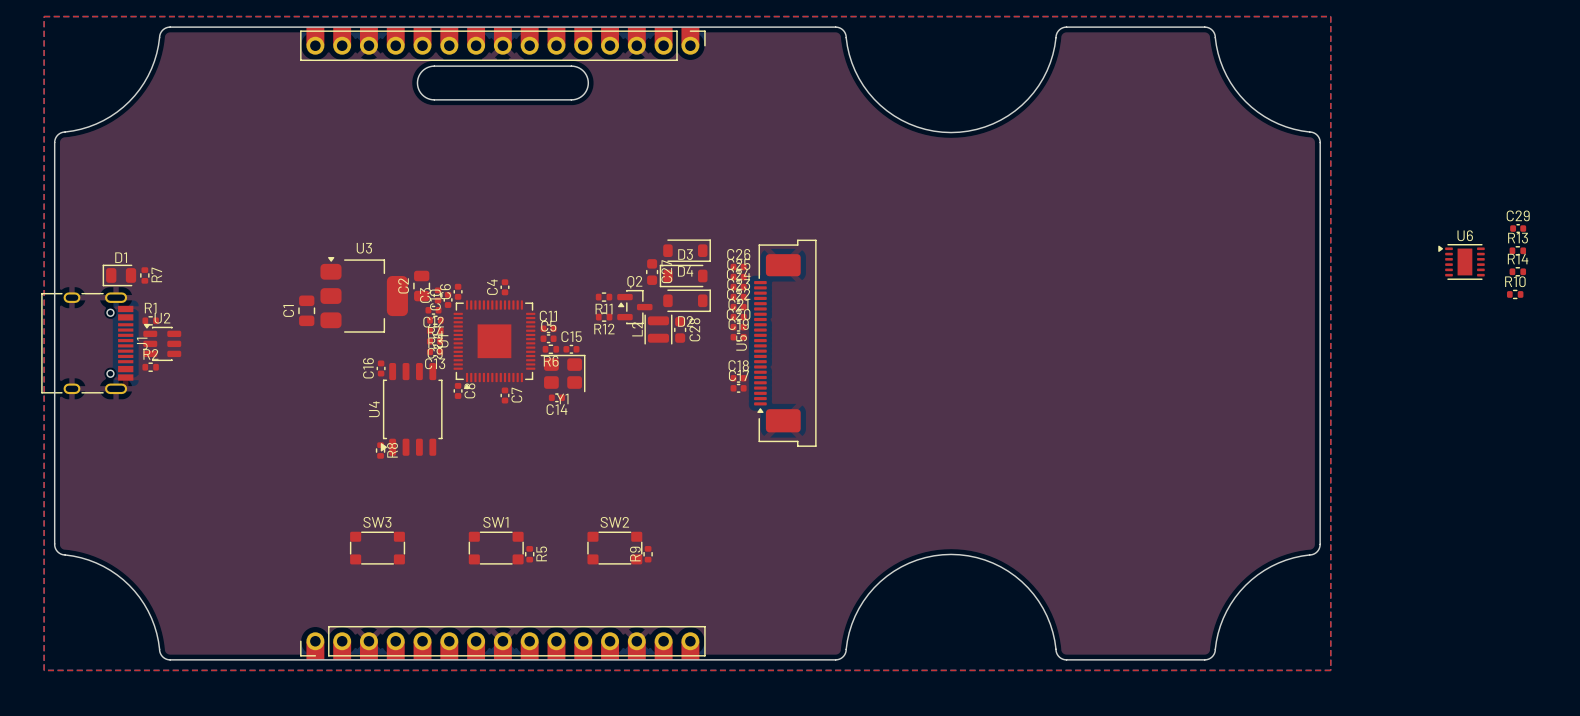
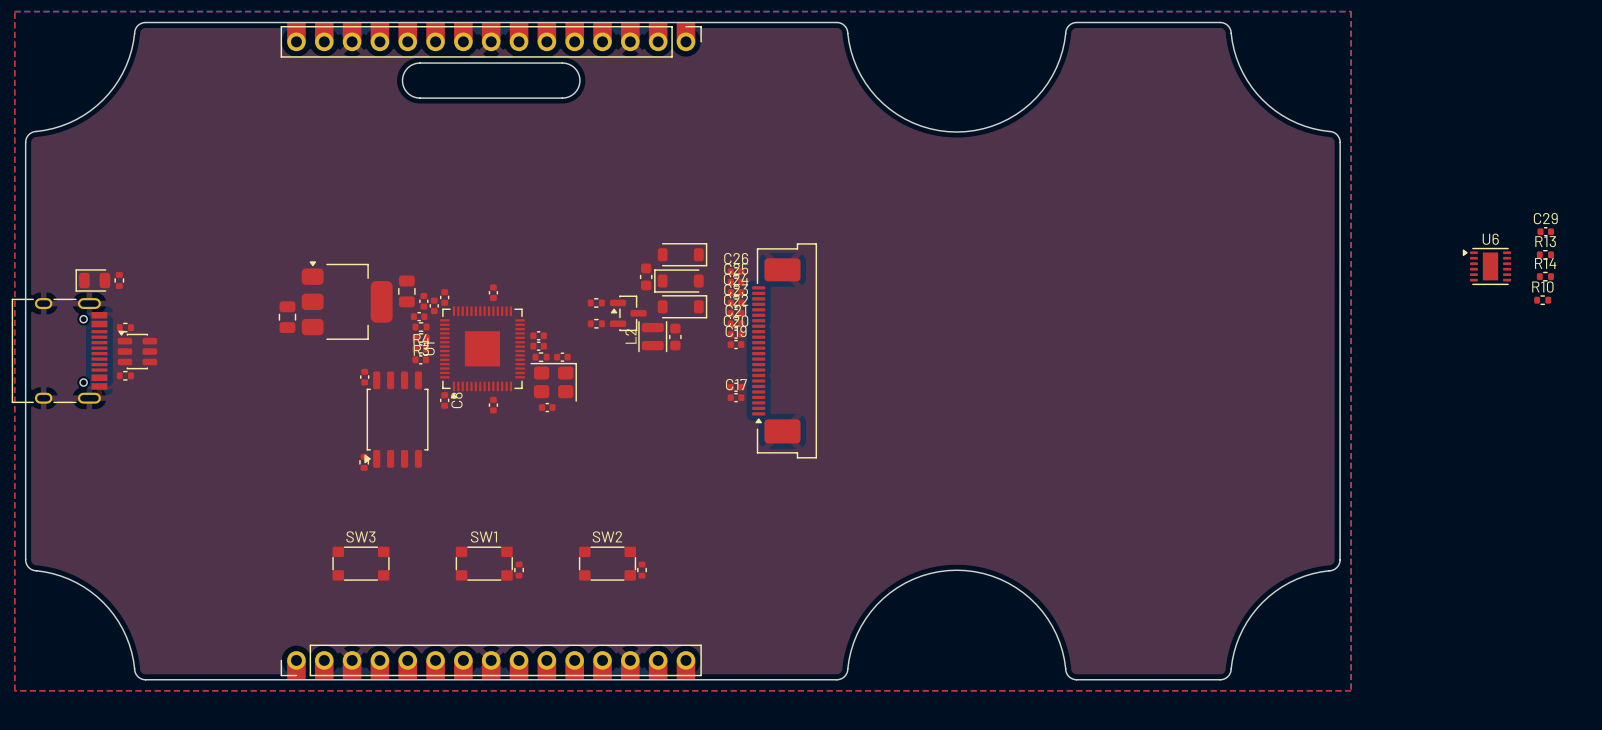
U3 name: U3 (364, 248) -> none
D3 name: D3 (685, 254) -> none
D1 name: D1 (121, 257) -> none
C27 name: C27 (666, 271) -> none
D4 name: D4 (685, 271) -> none
R7 name: R7 (156, 274) -> none
Q2 name: Q2 (634, 282) -> none
C2 name: C2 (403, 285) -> none
C4 name: C4 (492, 287) -> none
C6 name: C6 (445, 291) -> none
C3 name: C3 (425, 295) -> none
C10 name: C10 (435, 299) -> none
R1 name: R1 (150, 308) -> none
R11 name: R11 (604, 309) -> none
C1 name: C1 (288, 310) -> none
C11 name: C11 (548, 316) -> none
U2 name: U2 (162, 318) -> none
D2 name: D2 (685, 321) -> none
C12 name: C12 (433, 322) -> none
C5 name: C5 (548, 326) -> none
R12 name: R12 (604, 329) -> none
C28 name: C28 (694, 329) -> none
C15 name: C15 (571, 336) -> none
U5 name: U5 (741, 342) -> none
J1 name: J1 (142, 343) -> none
C9 name: C9 (435, 353) -> none
R2 name: R2 (150, 354) -> none
R6 name: R6 (551, 361) -> none
C13 name: C13 (435, 363) -> none
C18 name: C18 (738, 365) -> none
C16 name: C16 (368, 368) -> none
C7 name: C7 (516, 395) -> none
Y1 name: Y1 (562, 398) -> none
U4 name: U4 (374, 409) -> none
C14 name: C14 (556, 409) -> none
R8 name: R8 (392, 450) -> none
R5 name: R5 (541, 553) -> none
R9 name: R9 (635, 554) -> none

